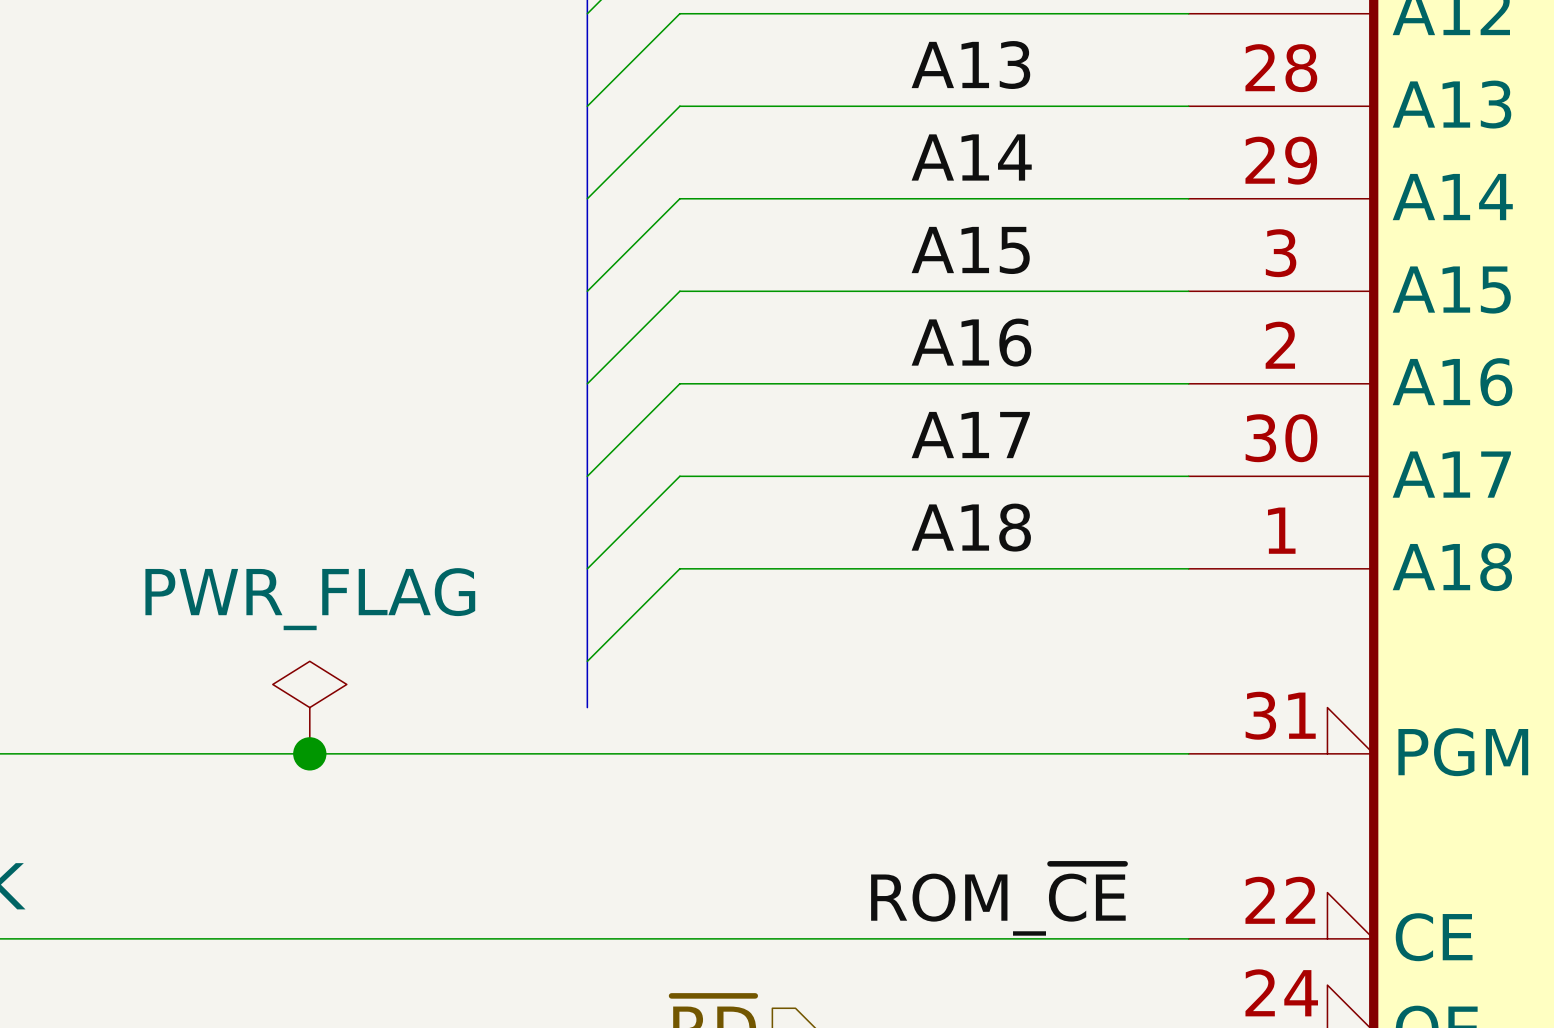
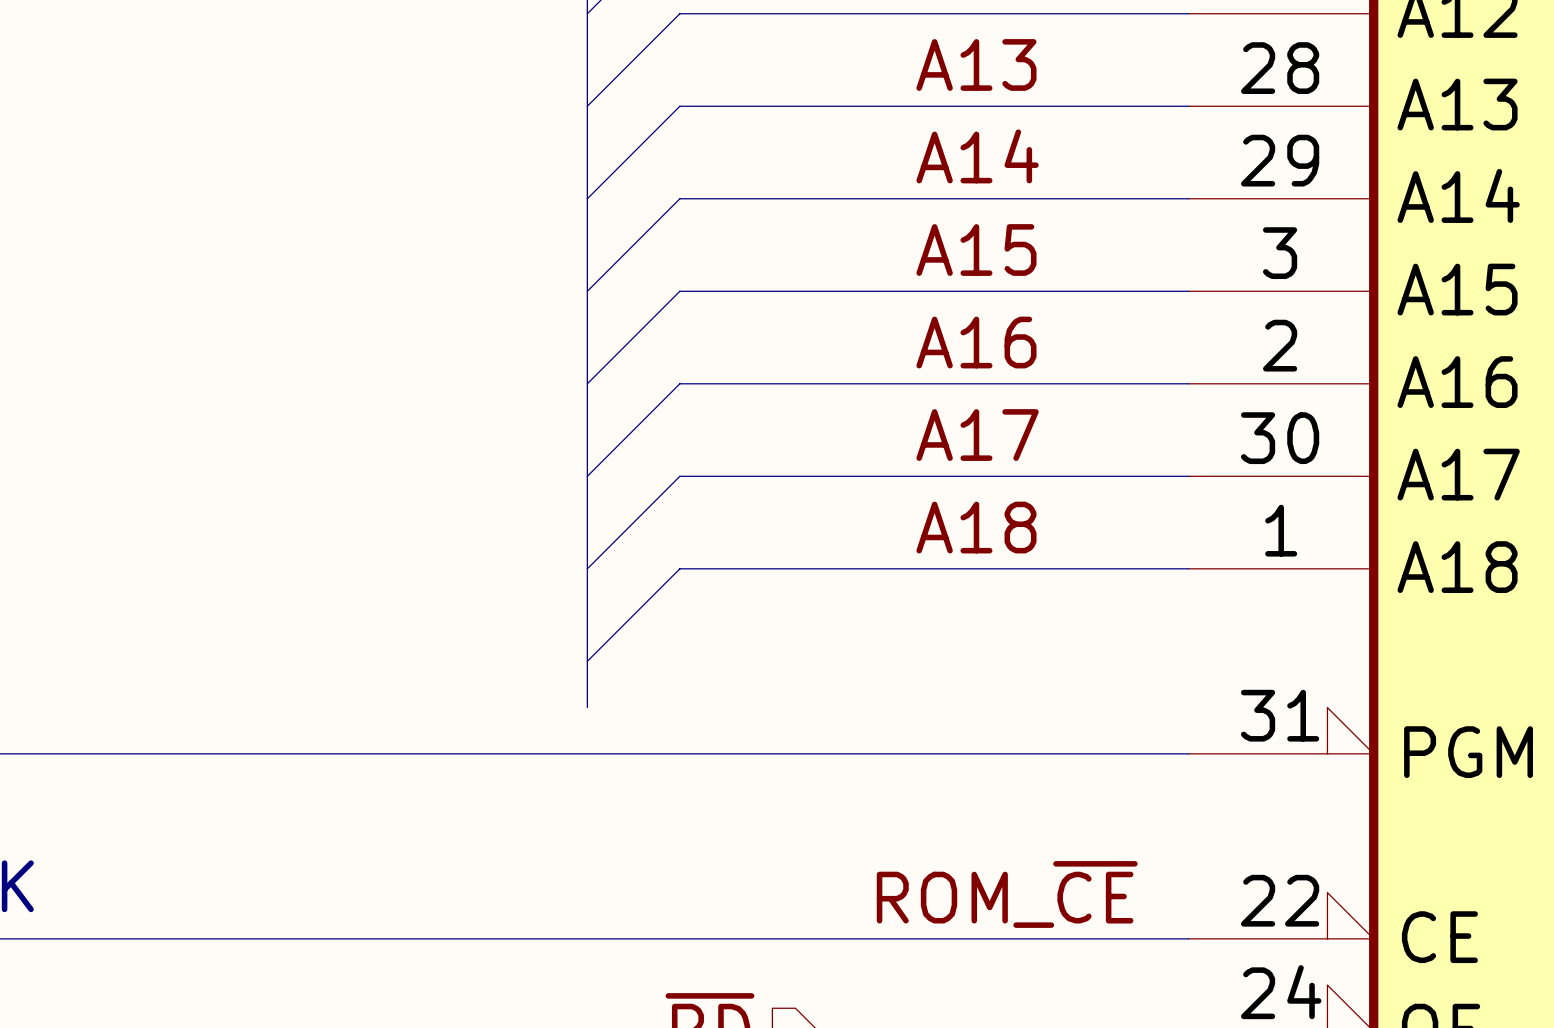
power symbol: PWR_FLAG (309, 707) -> none
junction: (309, 753) -> none

